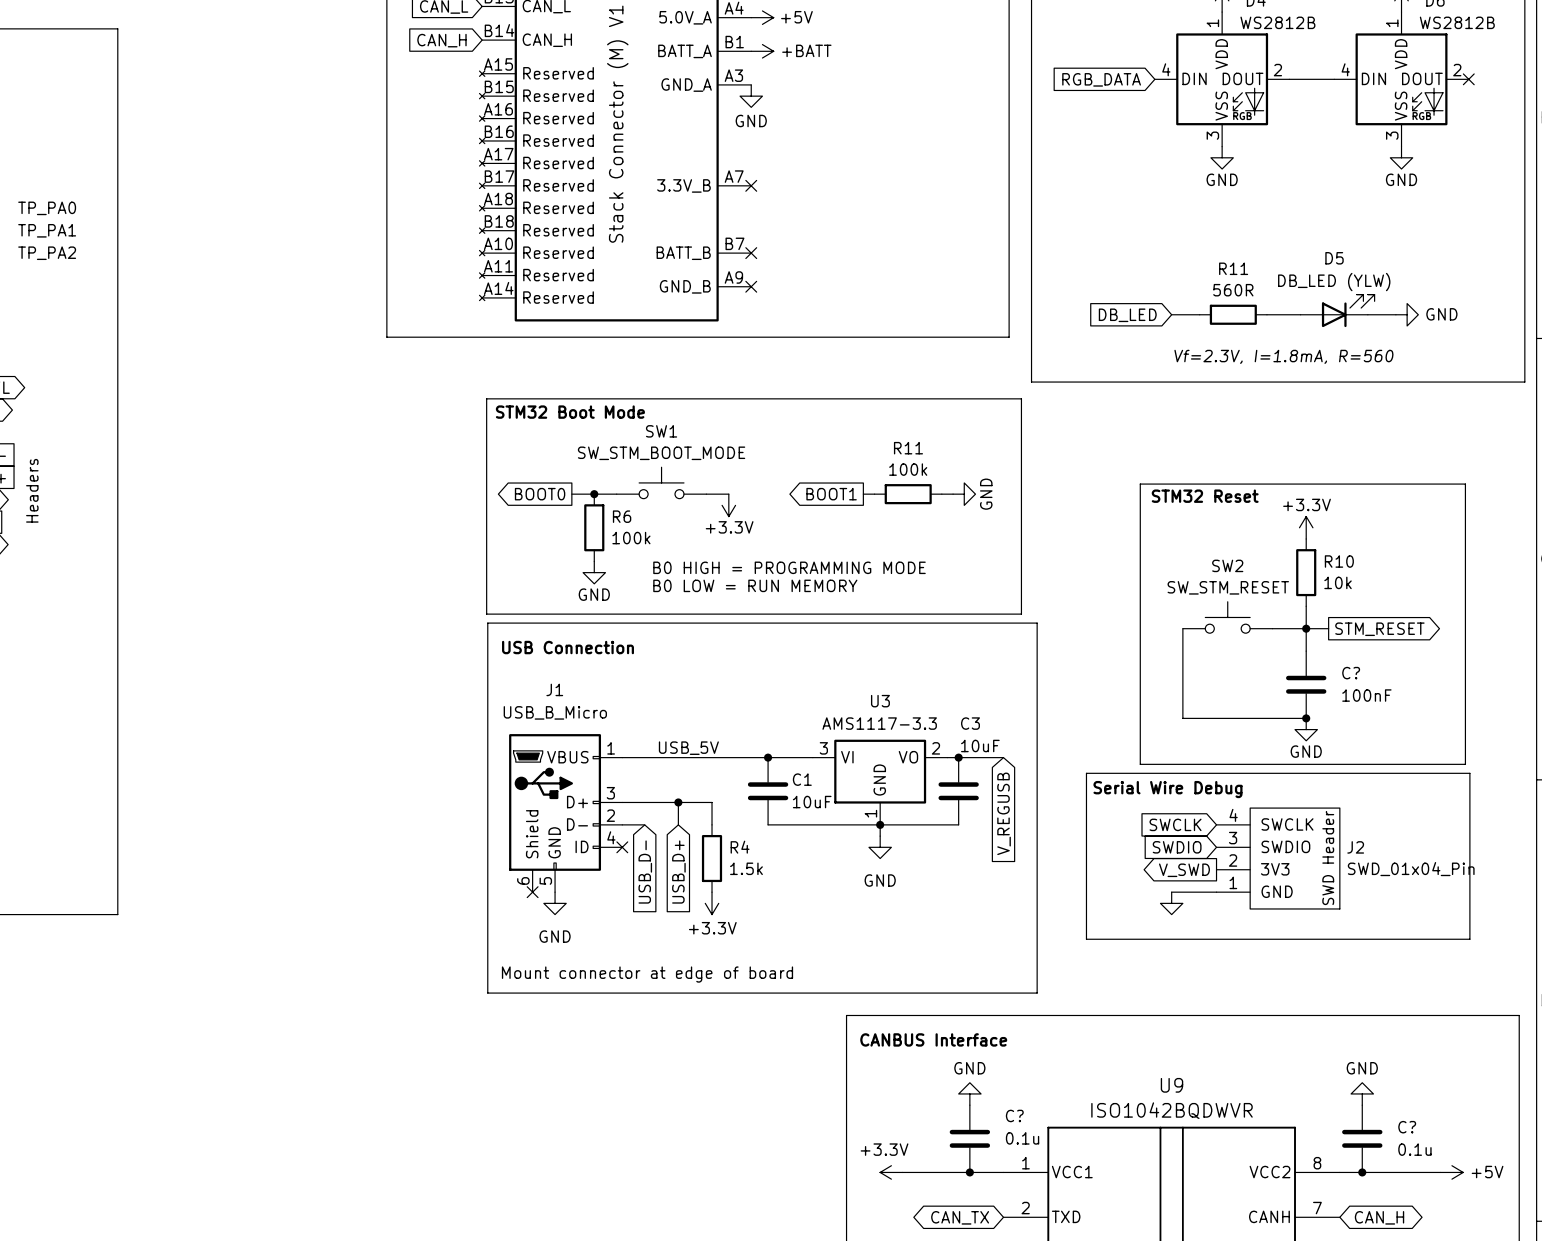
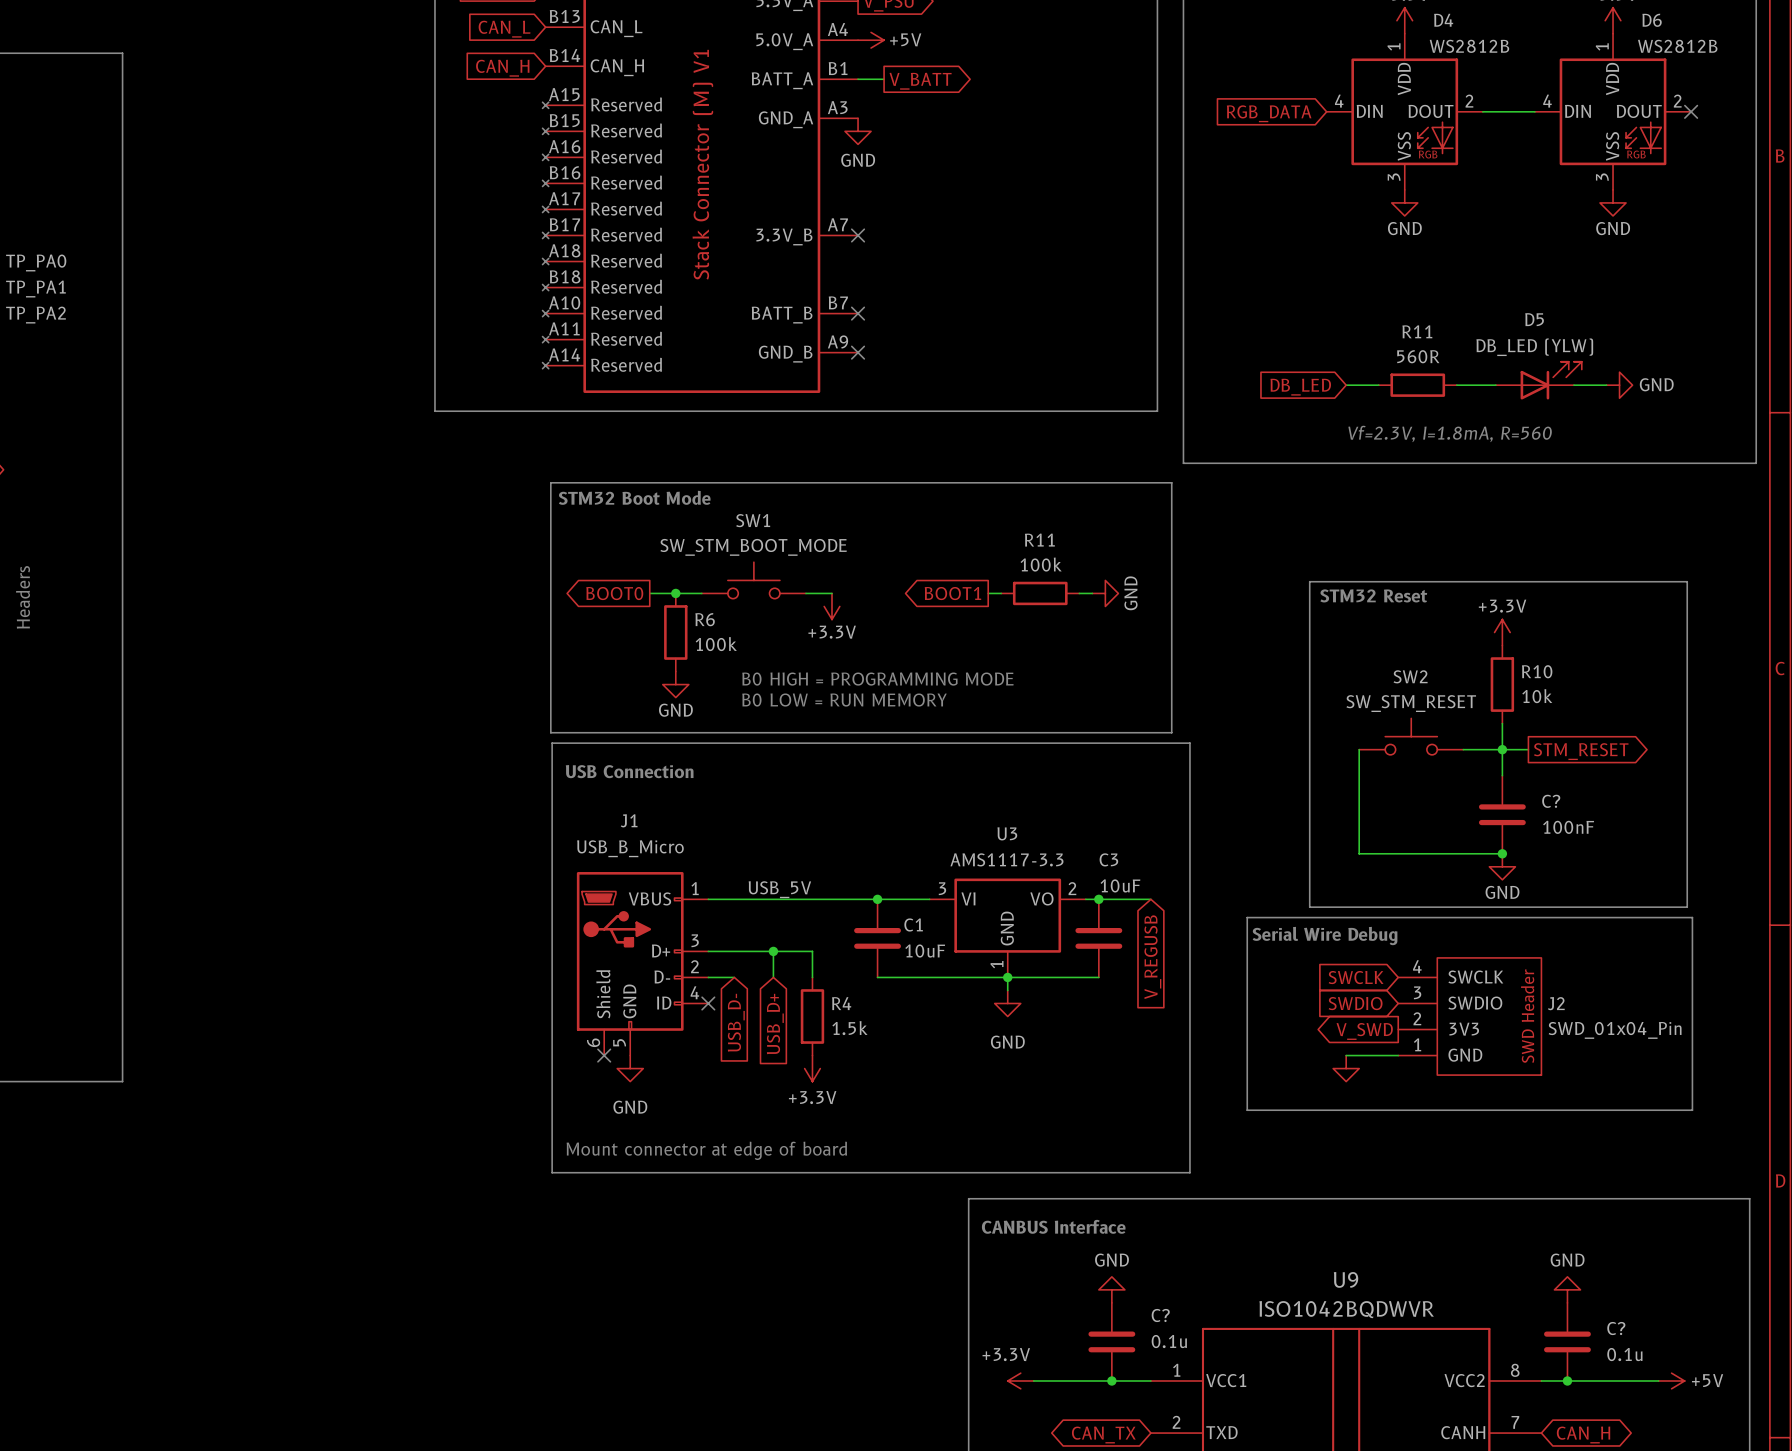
power symbol: +BATT (762, 51) -> none
global label: none -> V_BATT (920, 81)

